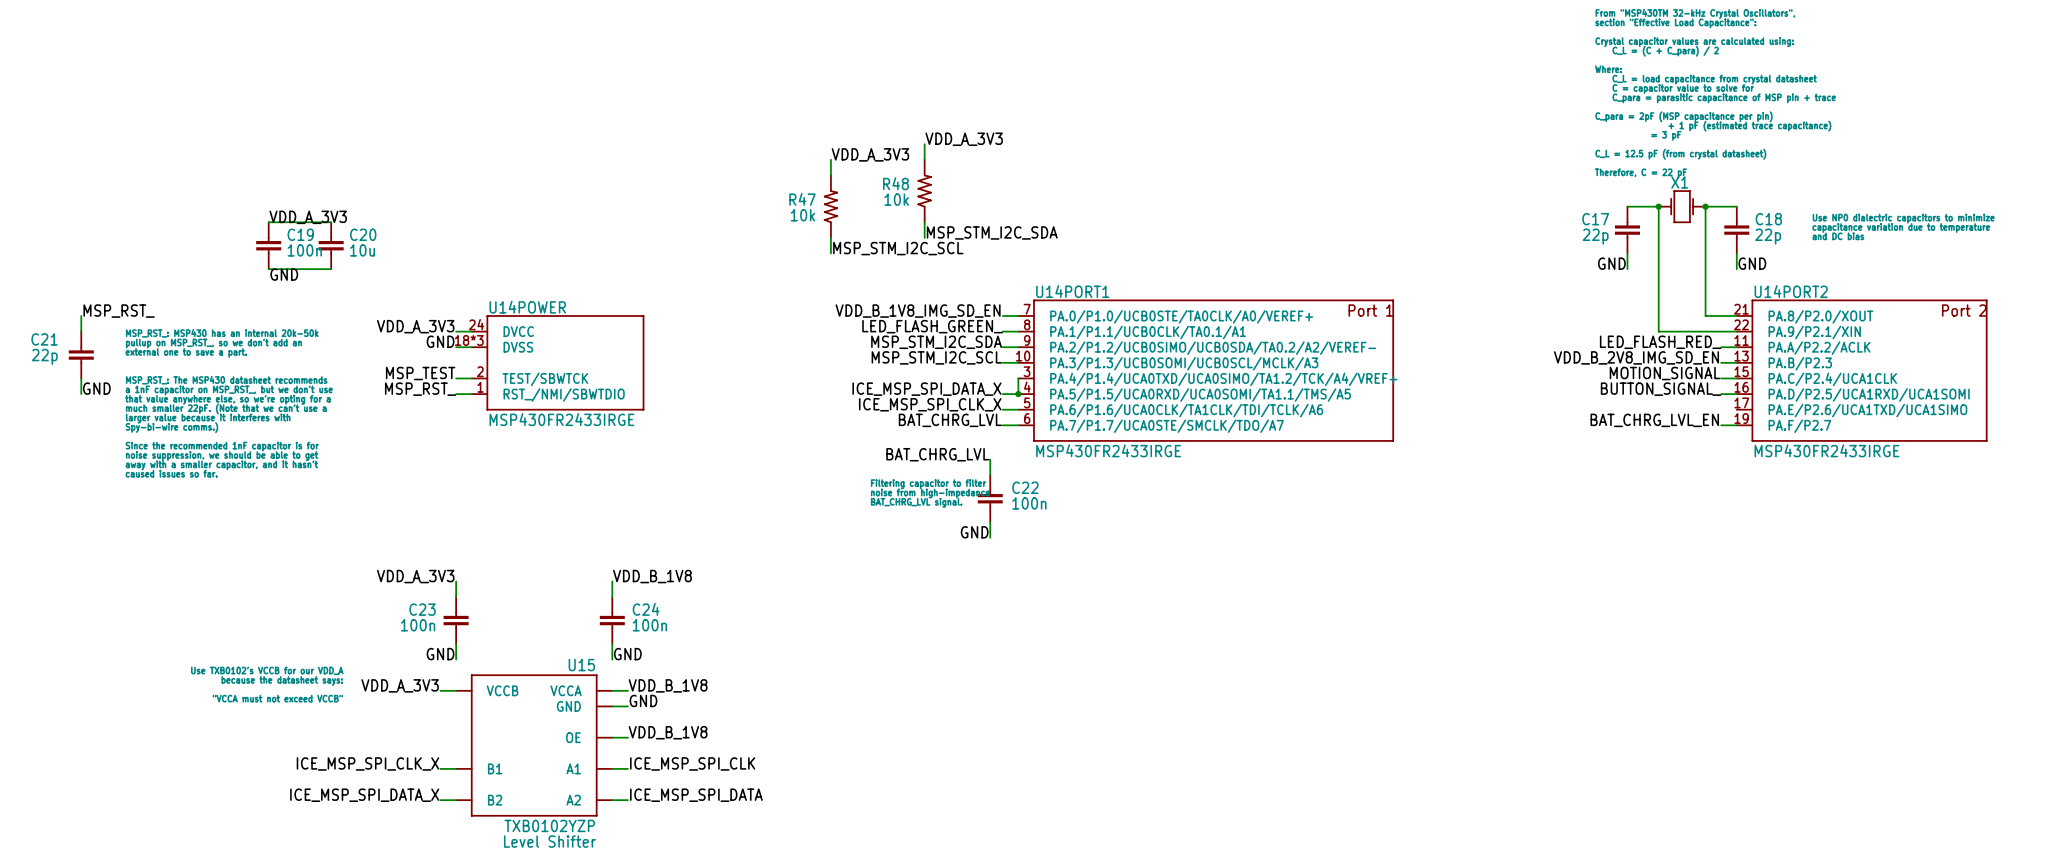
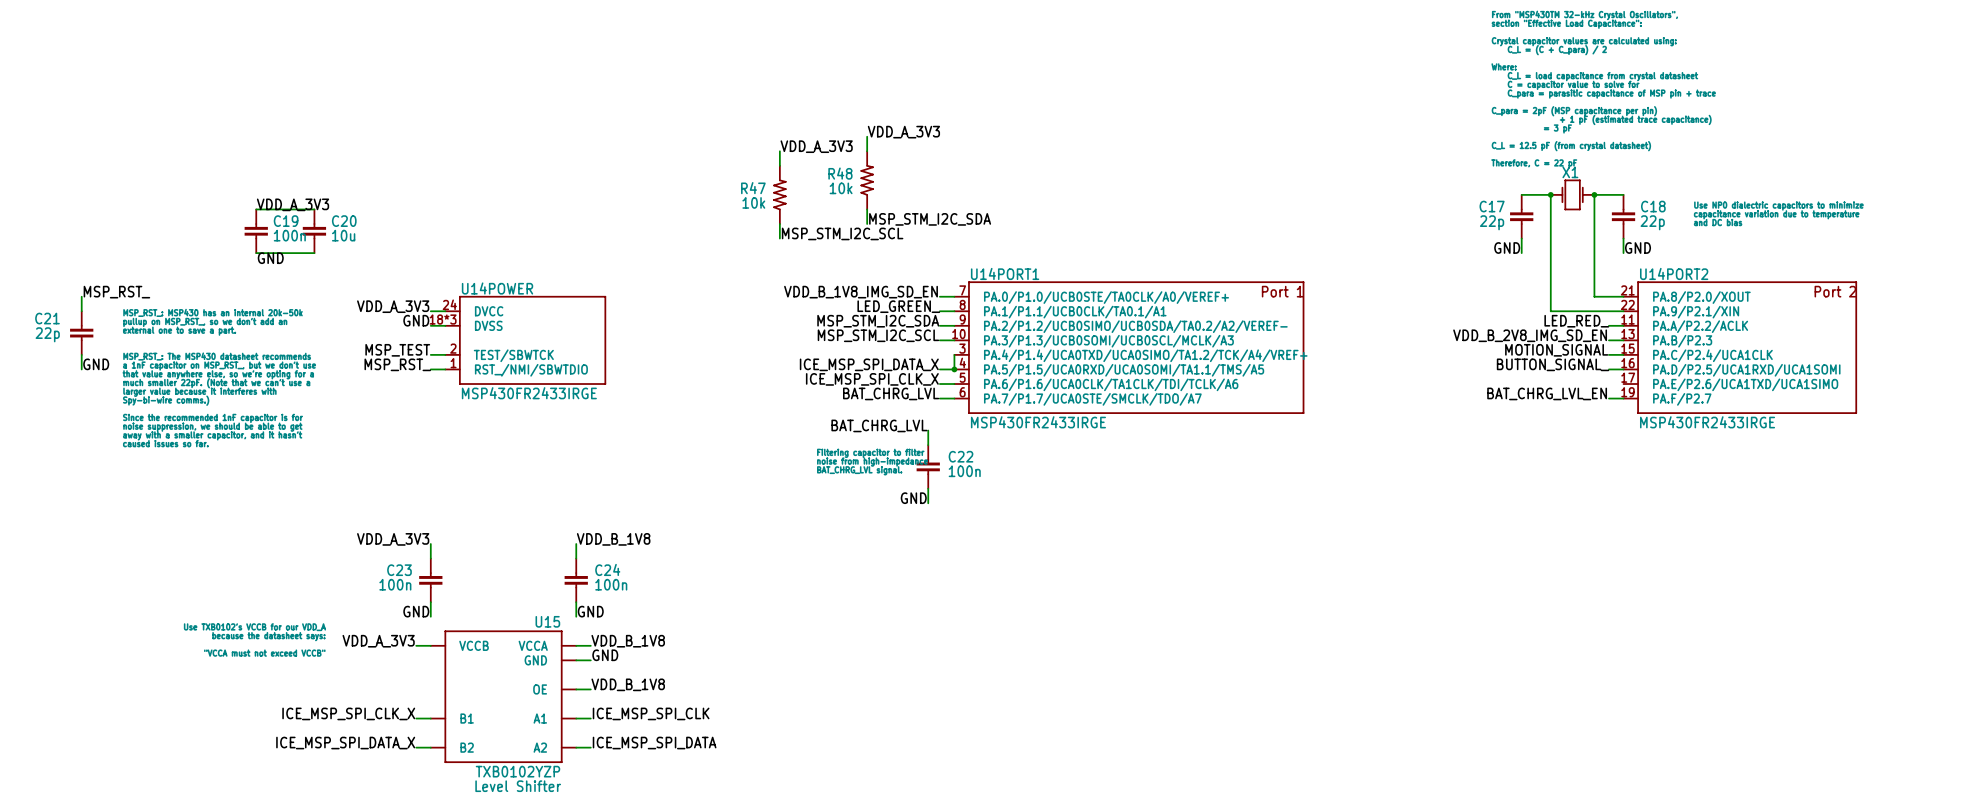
label: LED_FLASH_GREEN_ (932, 326) -> LED_GREEN_ (898, 306)
label: LED_FLASH_RED_ (1660, 342) -> LED_RED_ (1576, 321)

